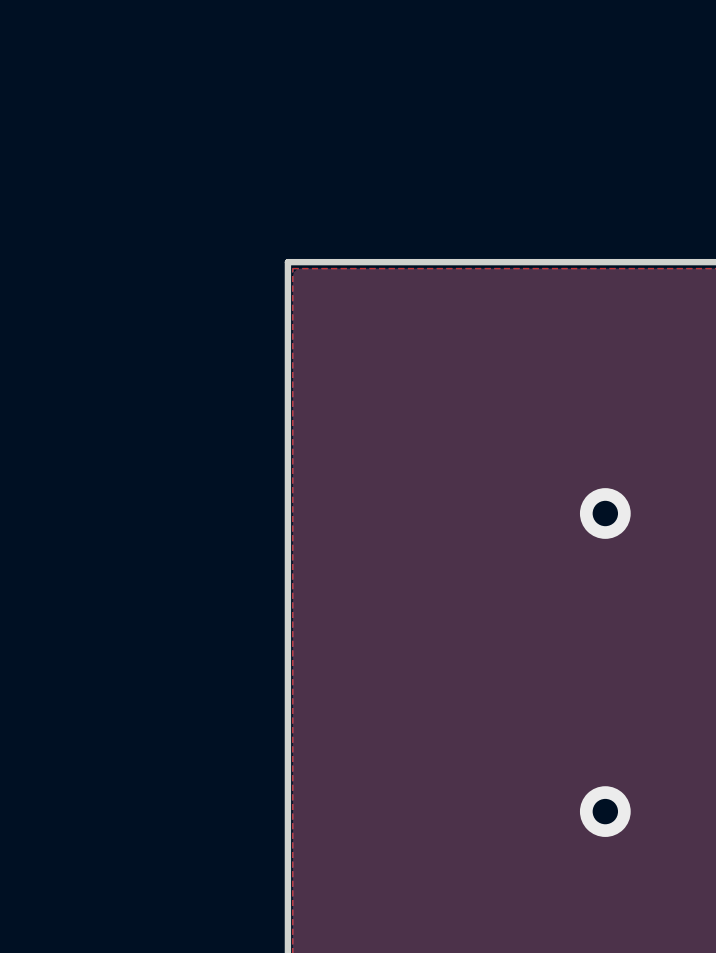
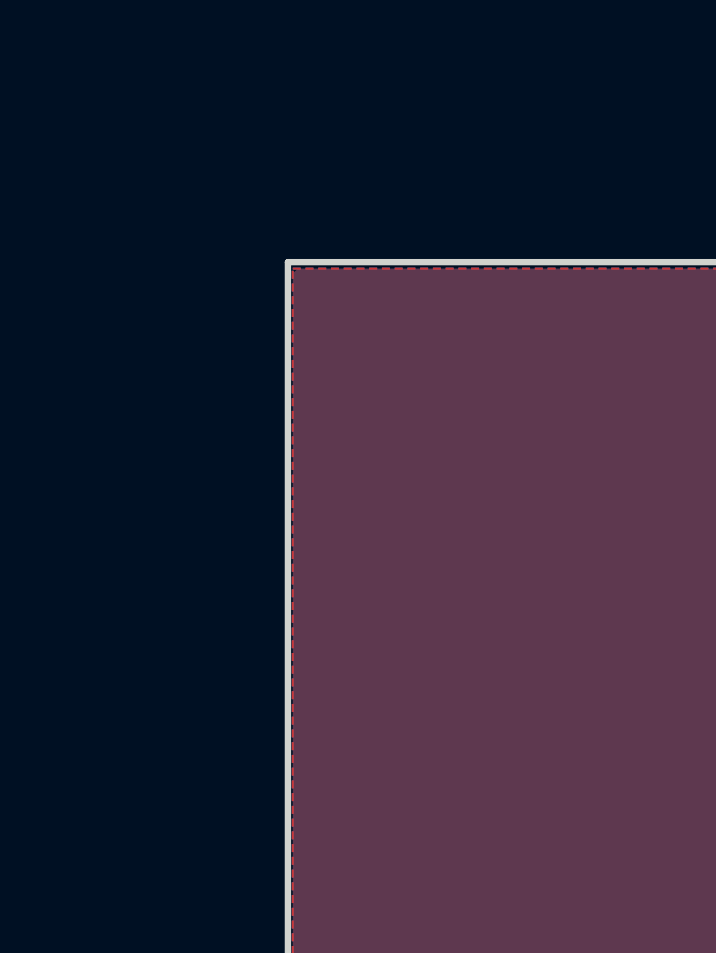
via: (605, 513) -> none
via: (605, 811) -> none

